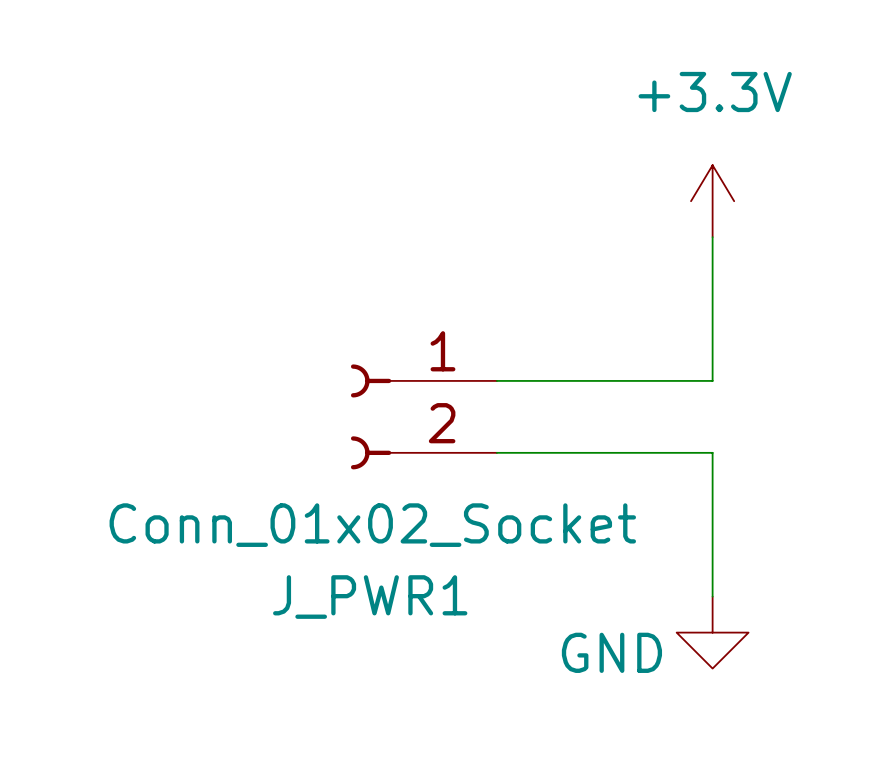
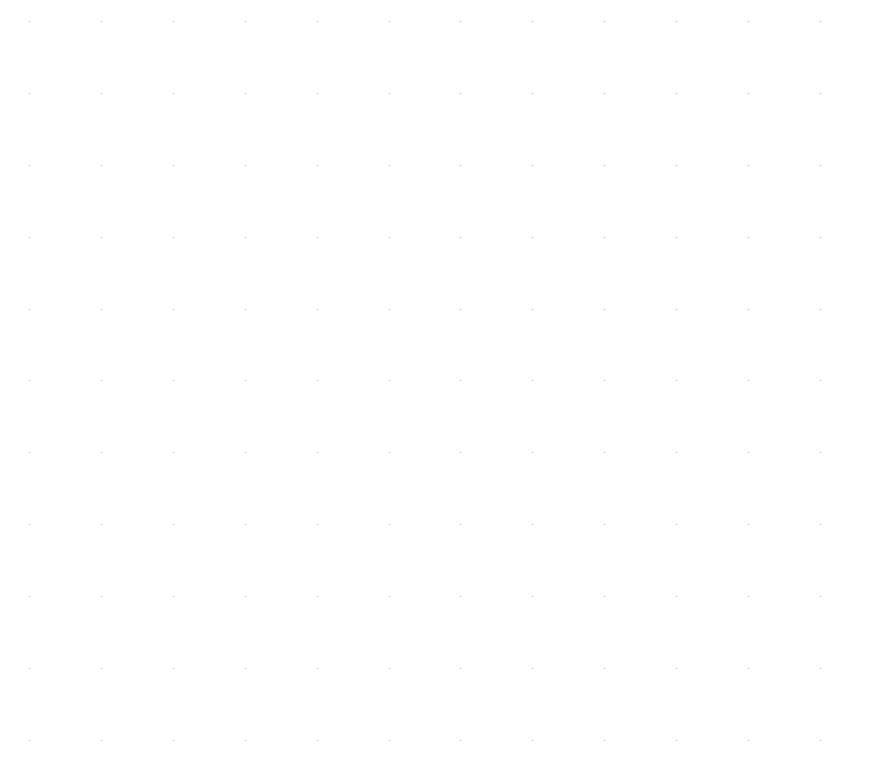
power symbol: +3.3V (712, 201) -> none
wire: (712, 237) (712, 380) (496, 380) -> none
J_PWR1: Conn_01x02_Socket (423, 416) -> none
wire: (496, 452) (712, 452) (712, 596) -> none
power symbol: GND (712, 632) -> none

